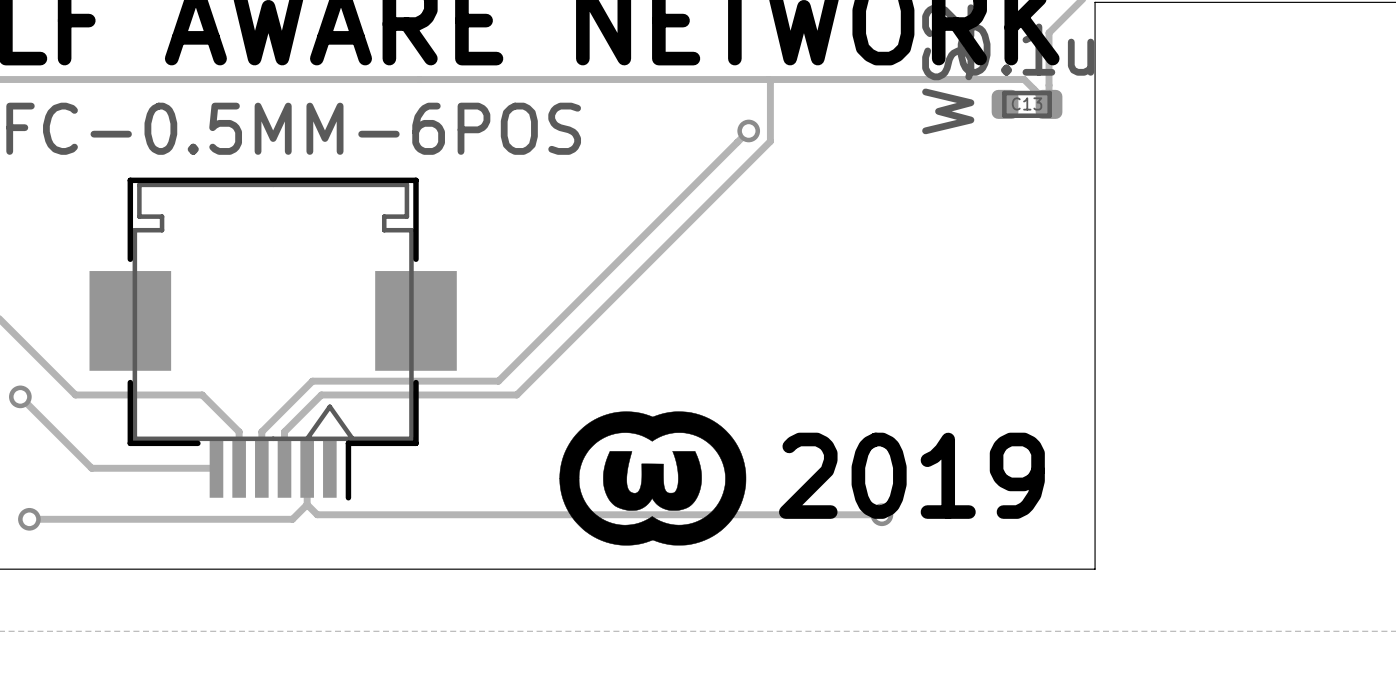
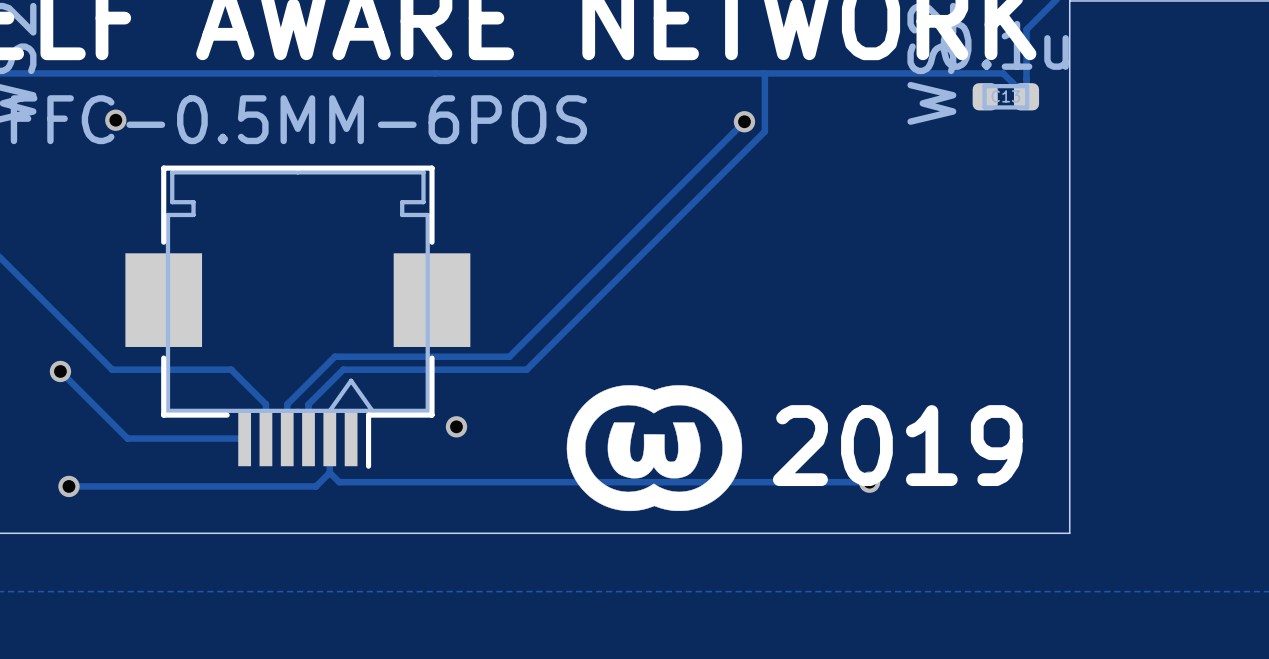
via: none -> (115, 120)
via: none -> (456, 426)

